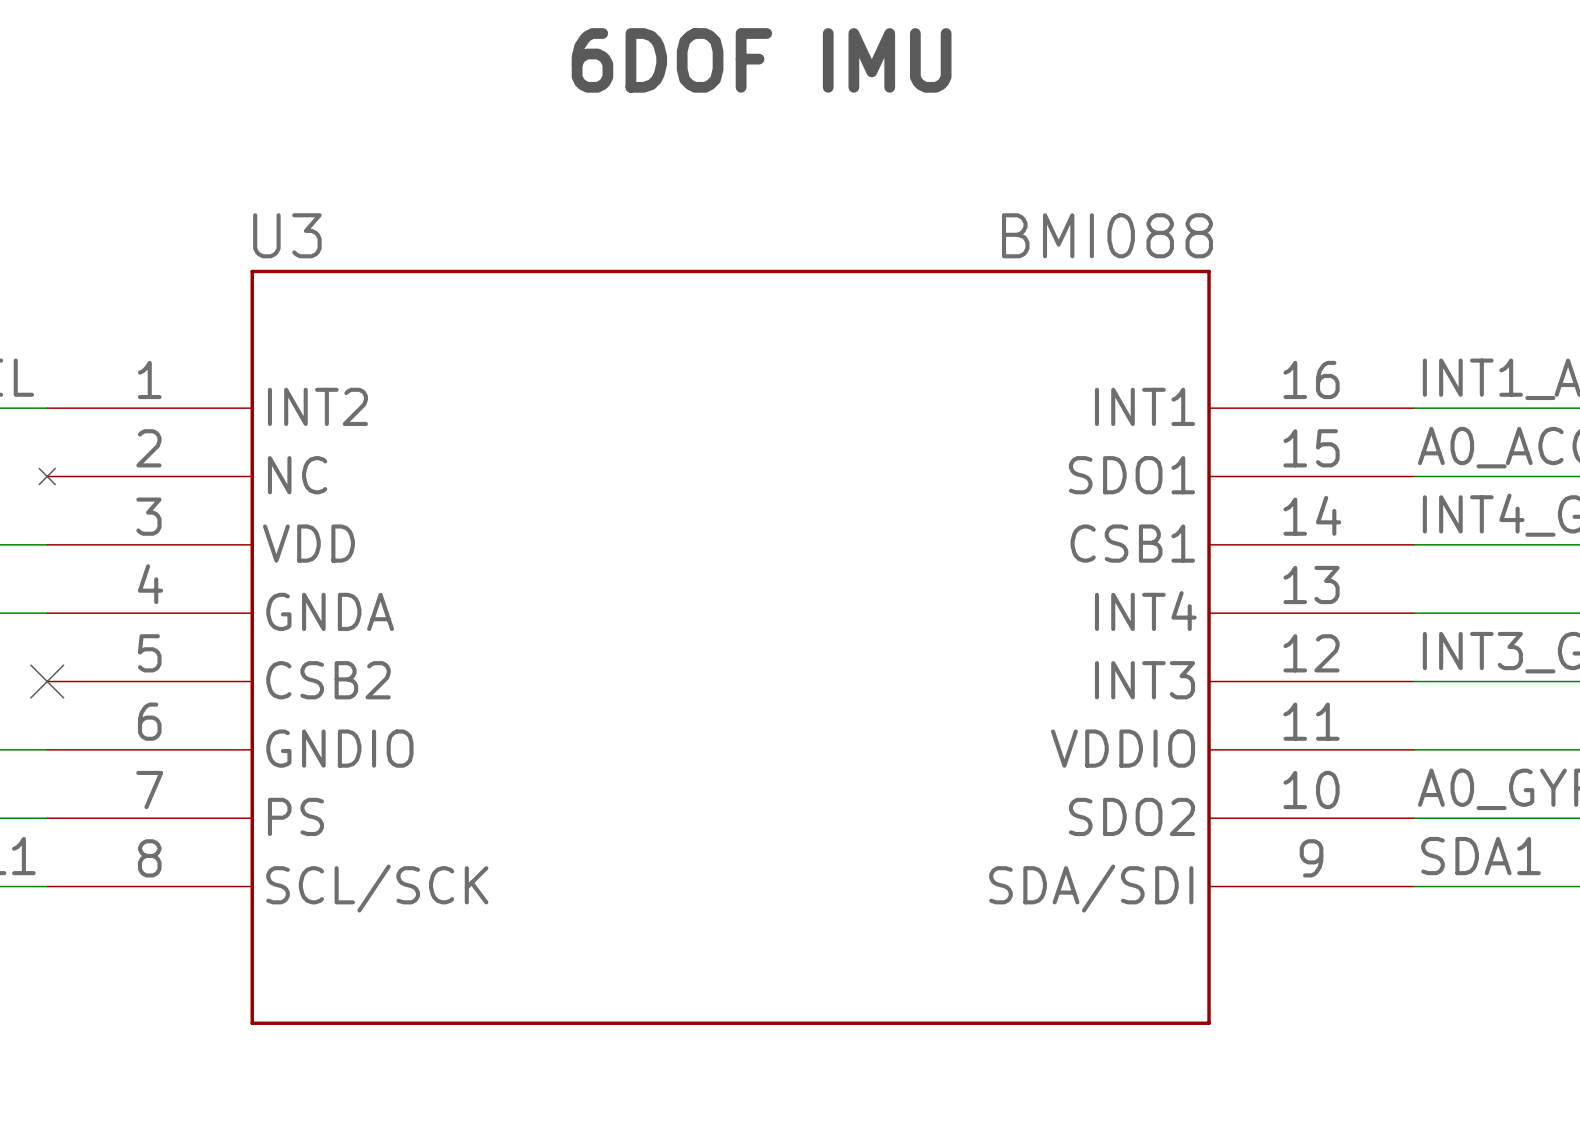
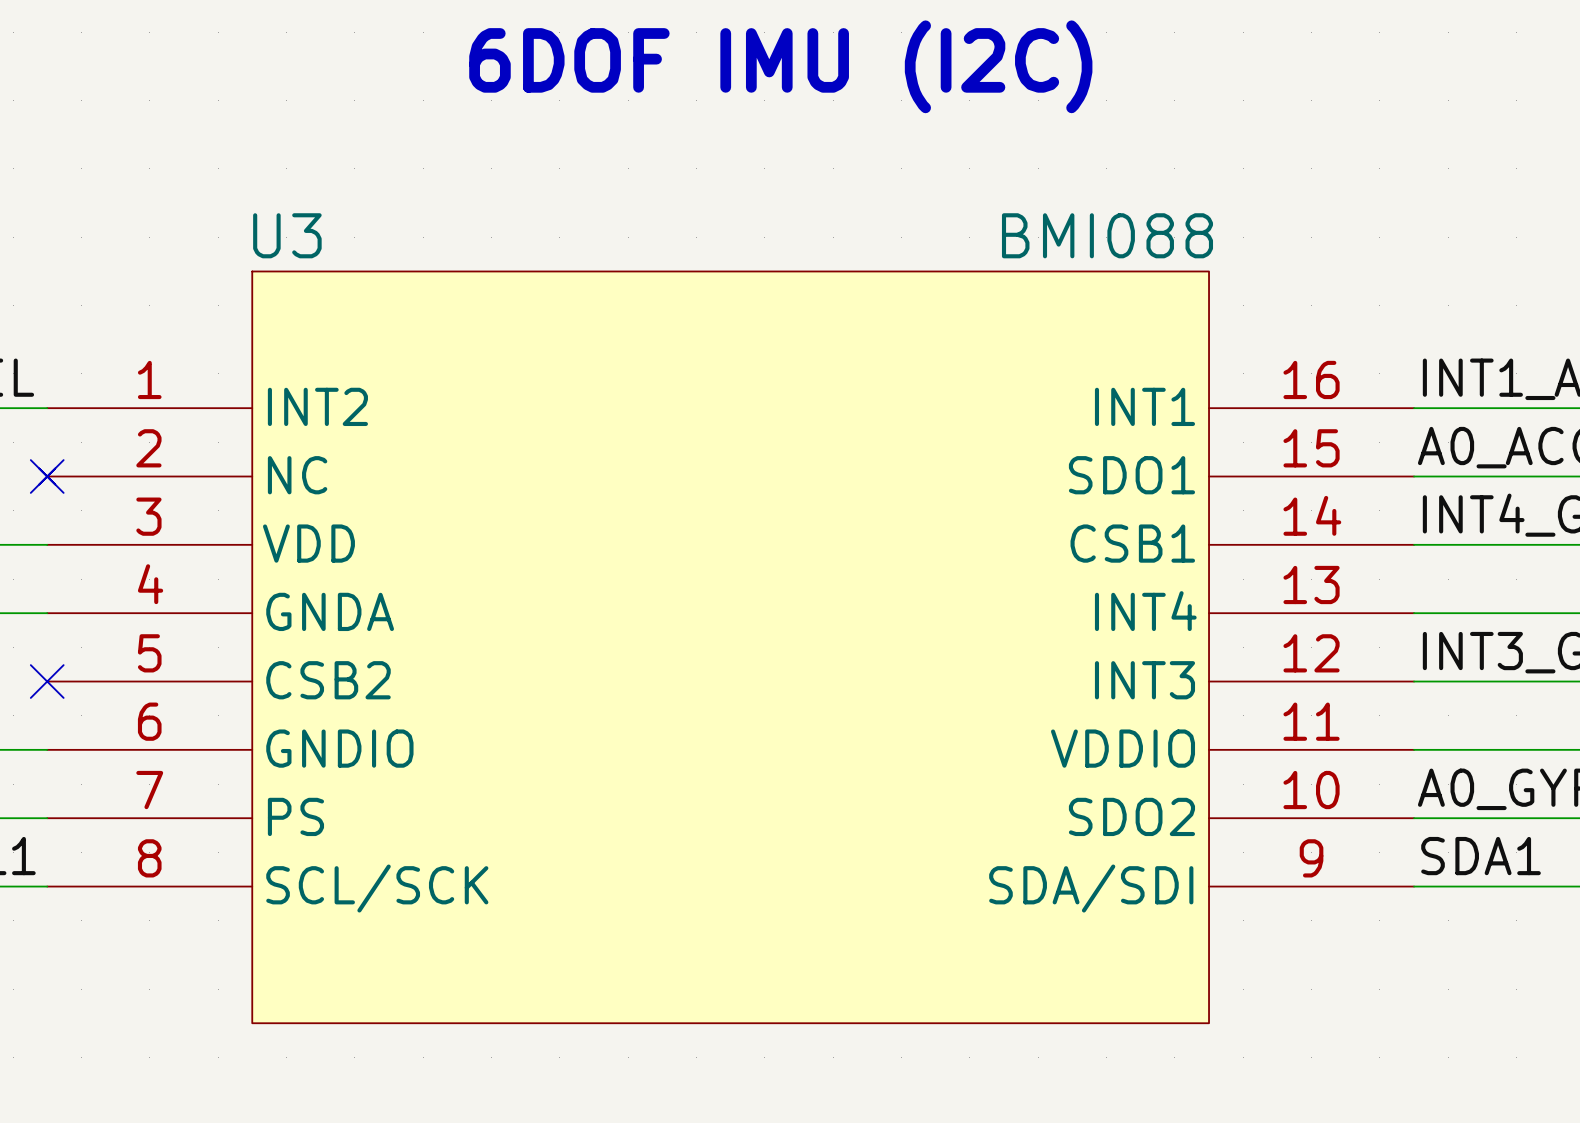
text: 6DOF IMU (761, 60) -> 6DOF IMU (I2C) (780, 66)
U3 symbol: [39, 269, 1415, 1025] -> [39, 271, 1415, 1024]
no-connect mark: none -> (47, 476)

